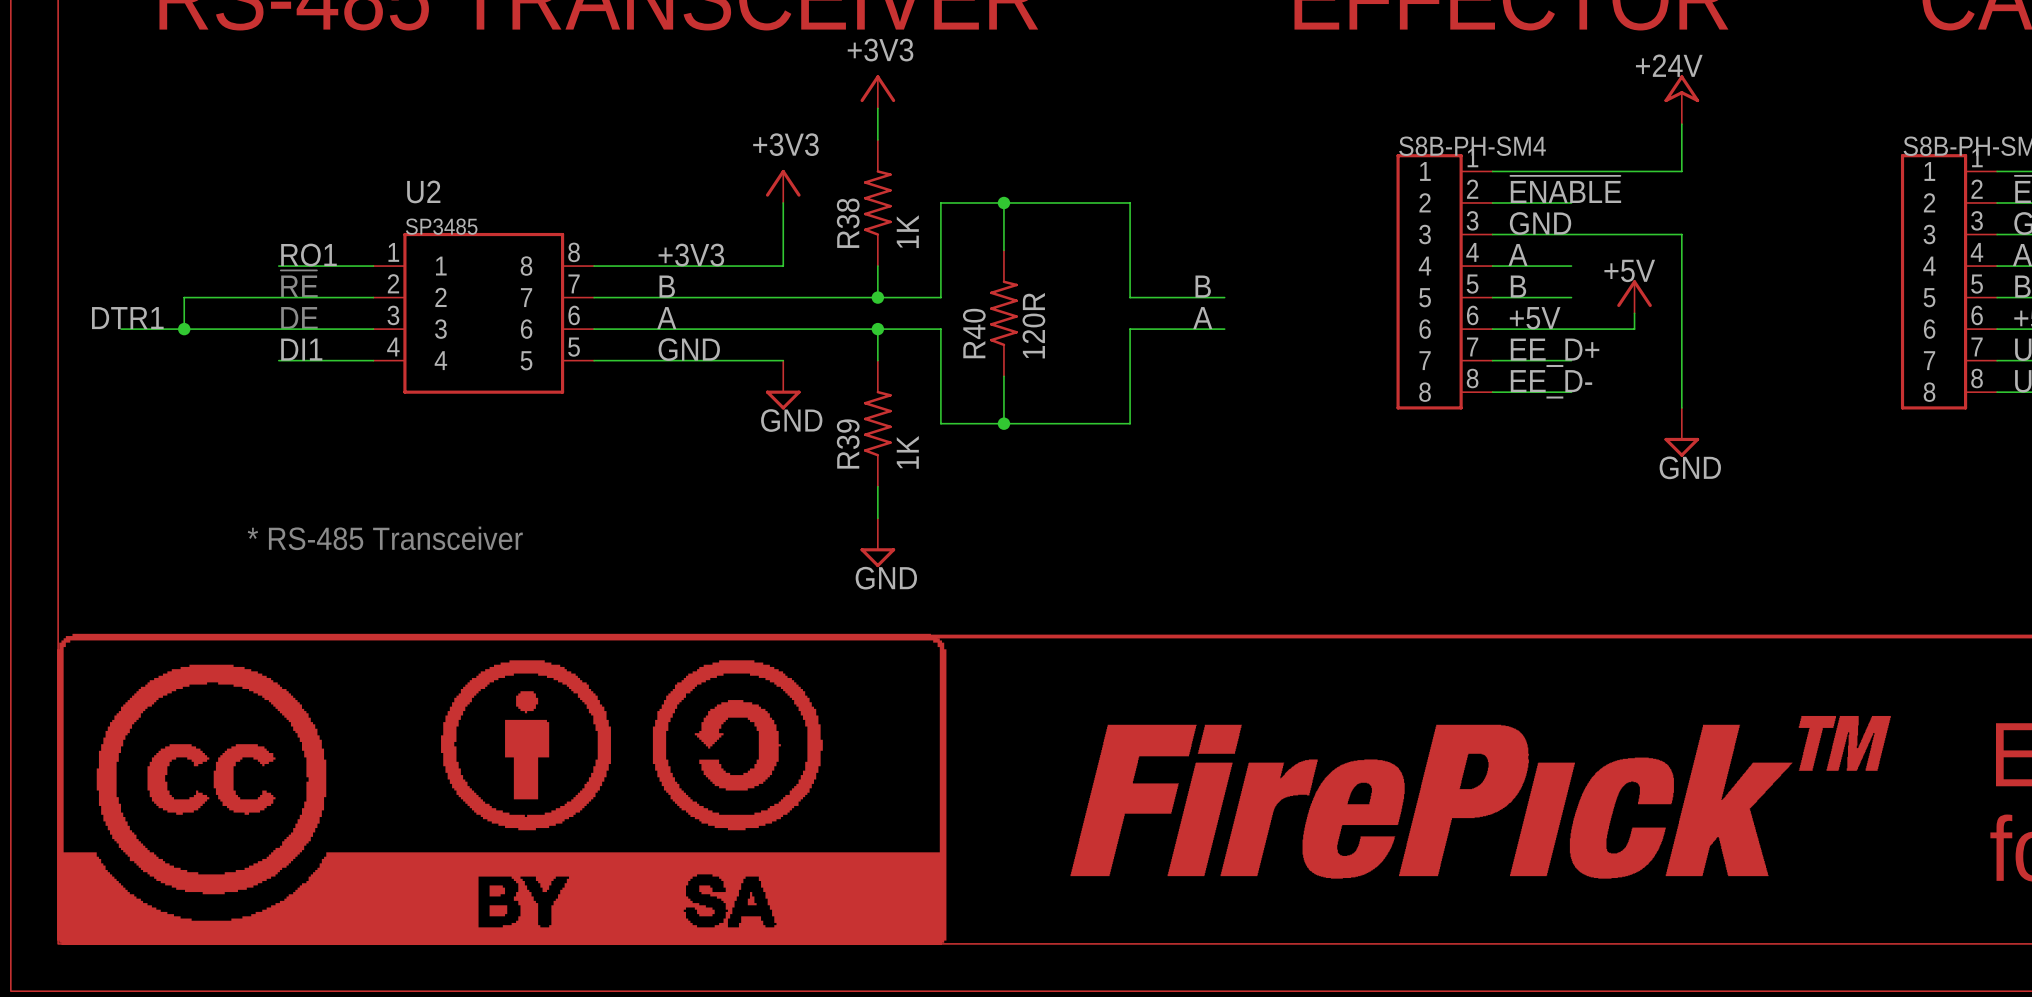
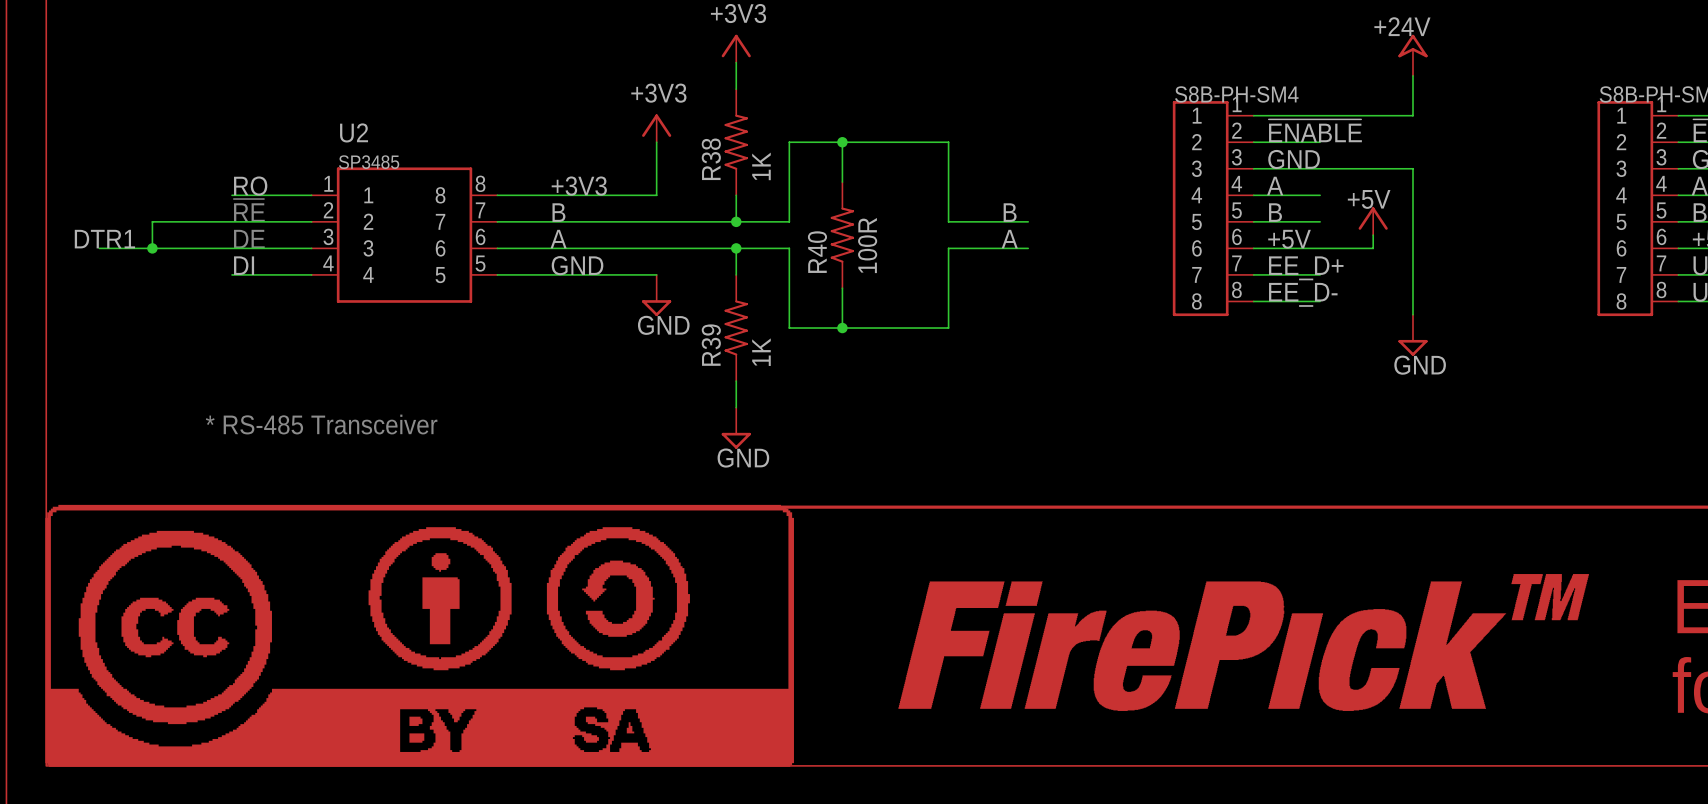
label: RO1 (308, 255) -> RO (250, 186)
R40 value: 120R (1033, 325) -> 100R (867, 245)
label: DI1 (301, 349) -> DI (244, 265)

